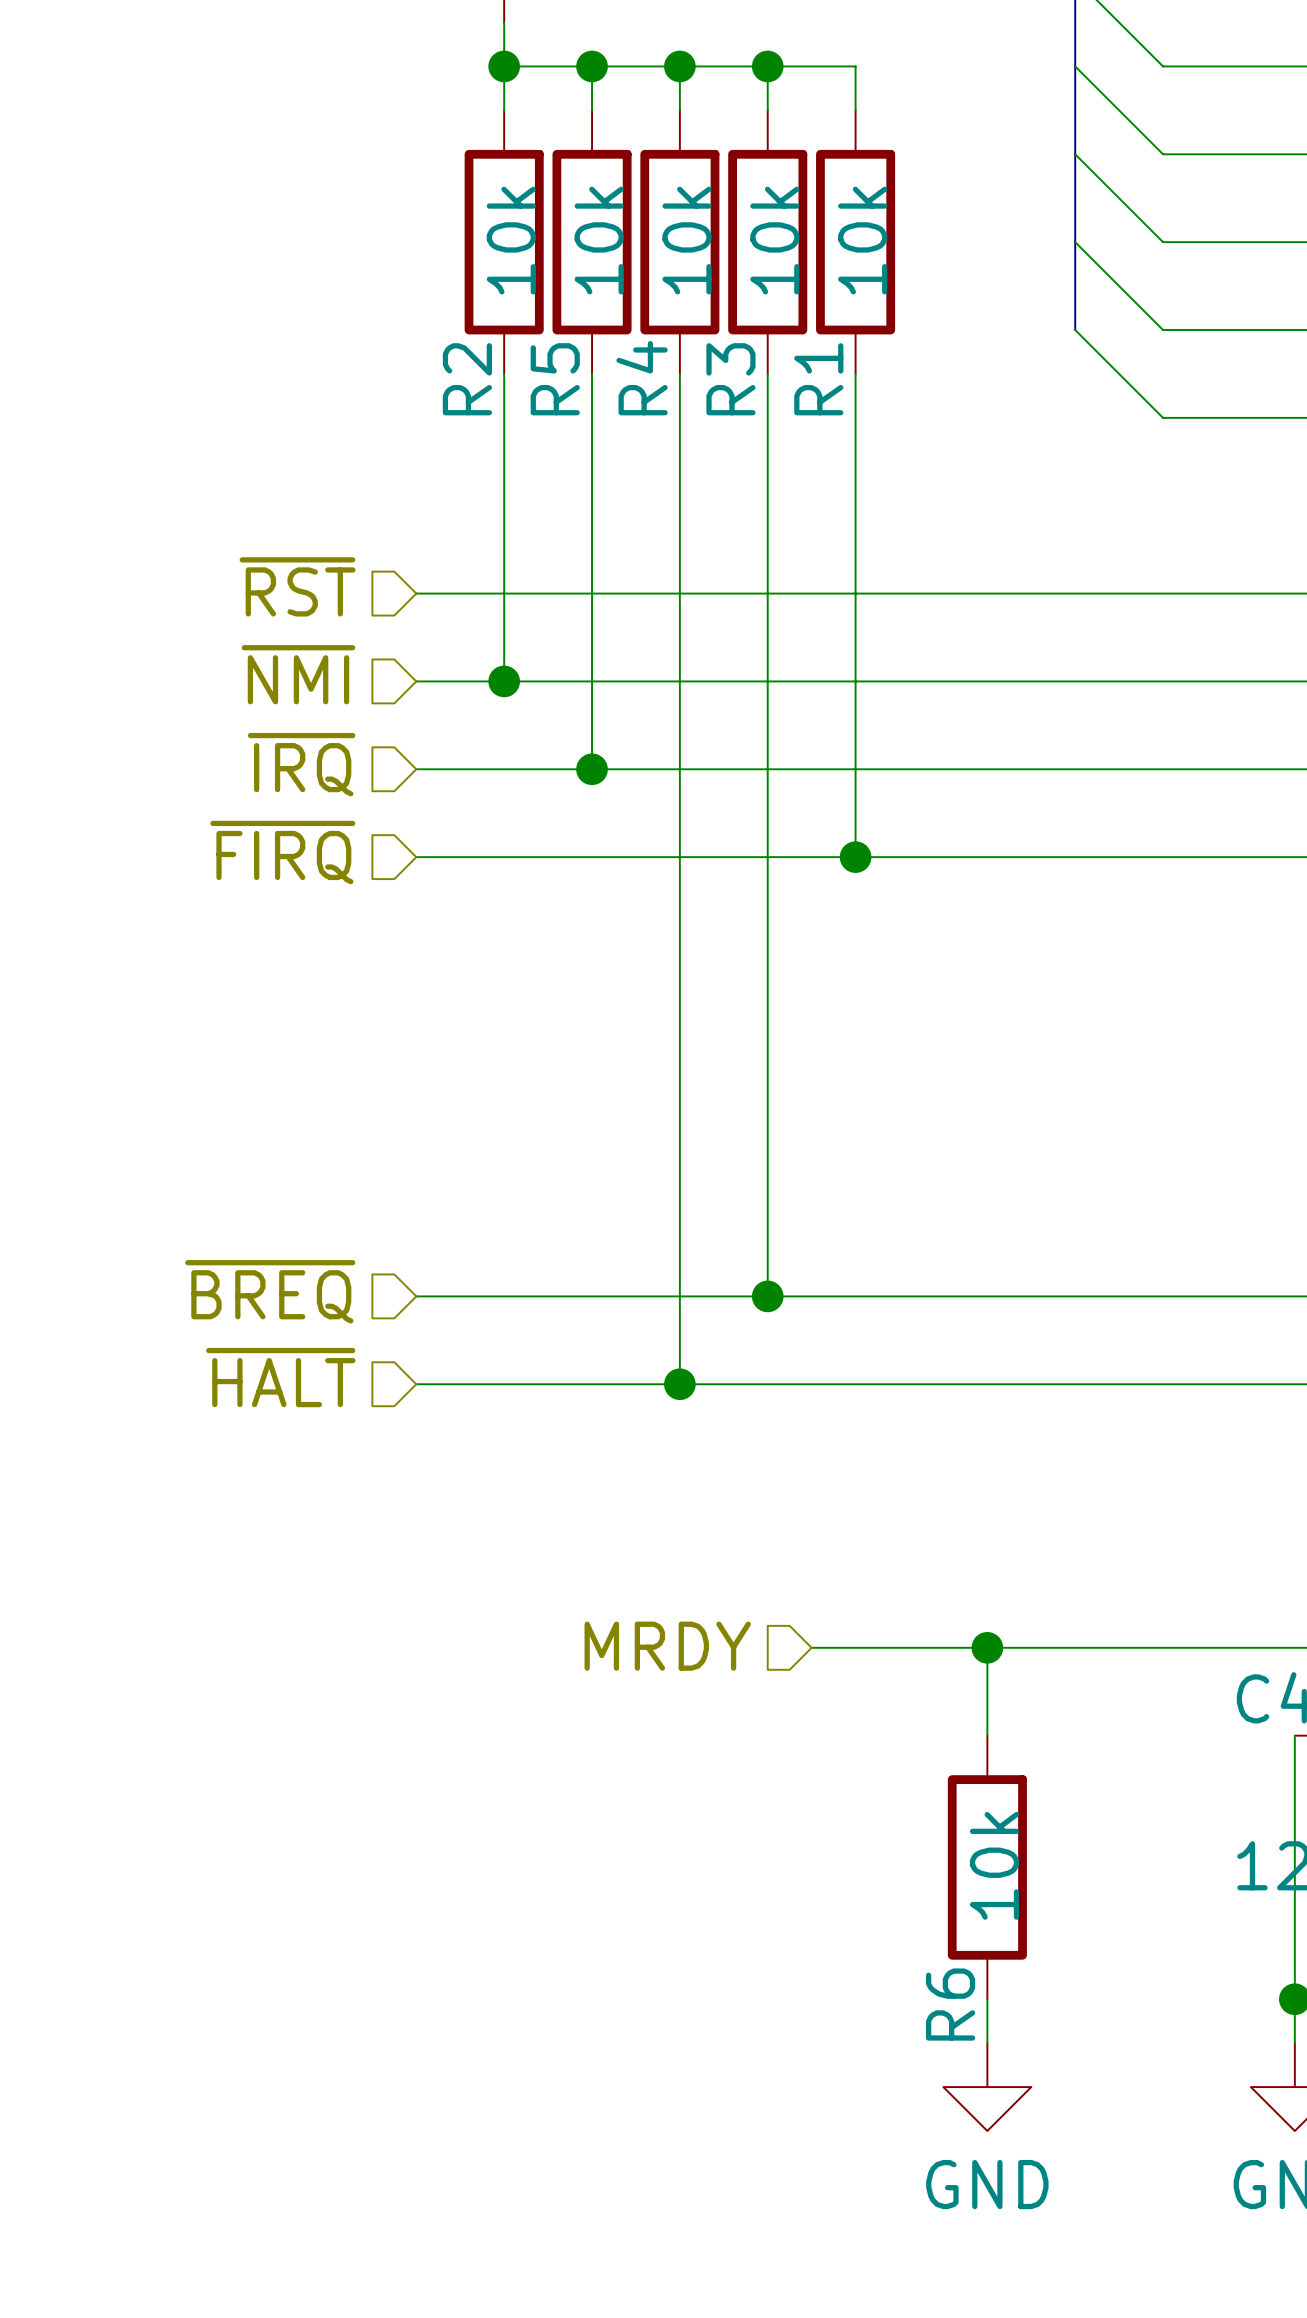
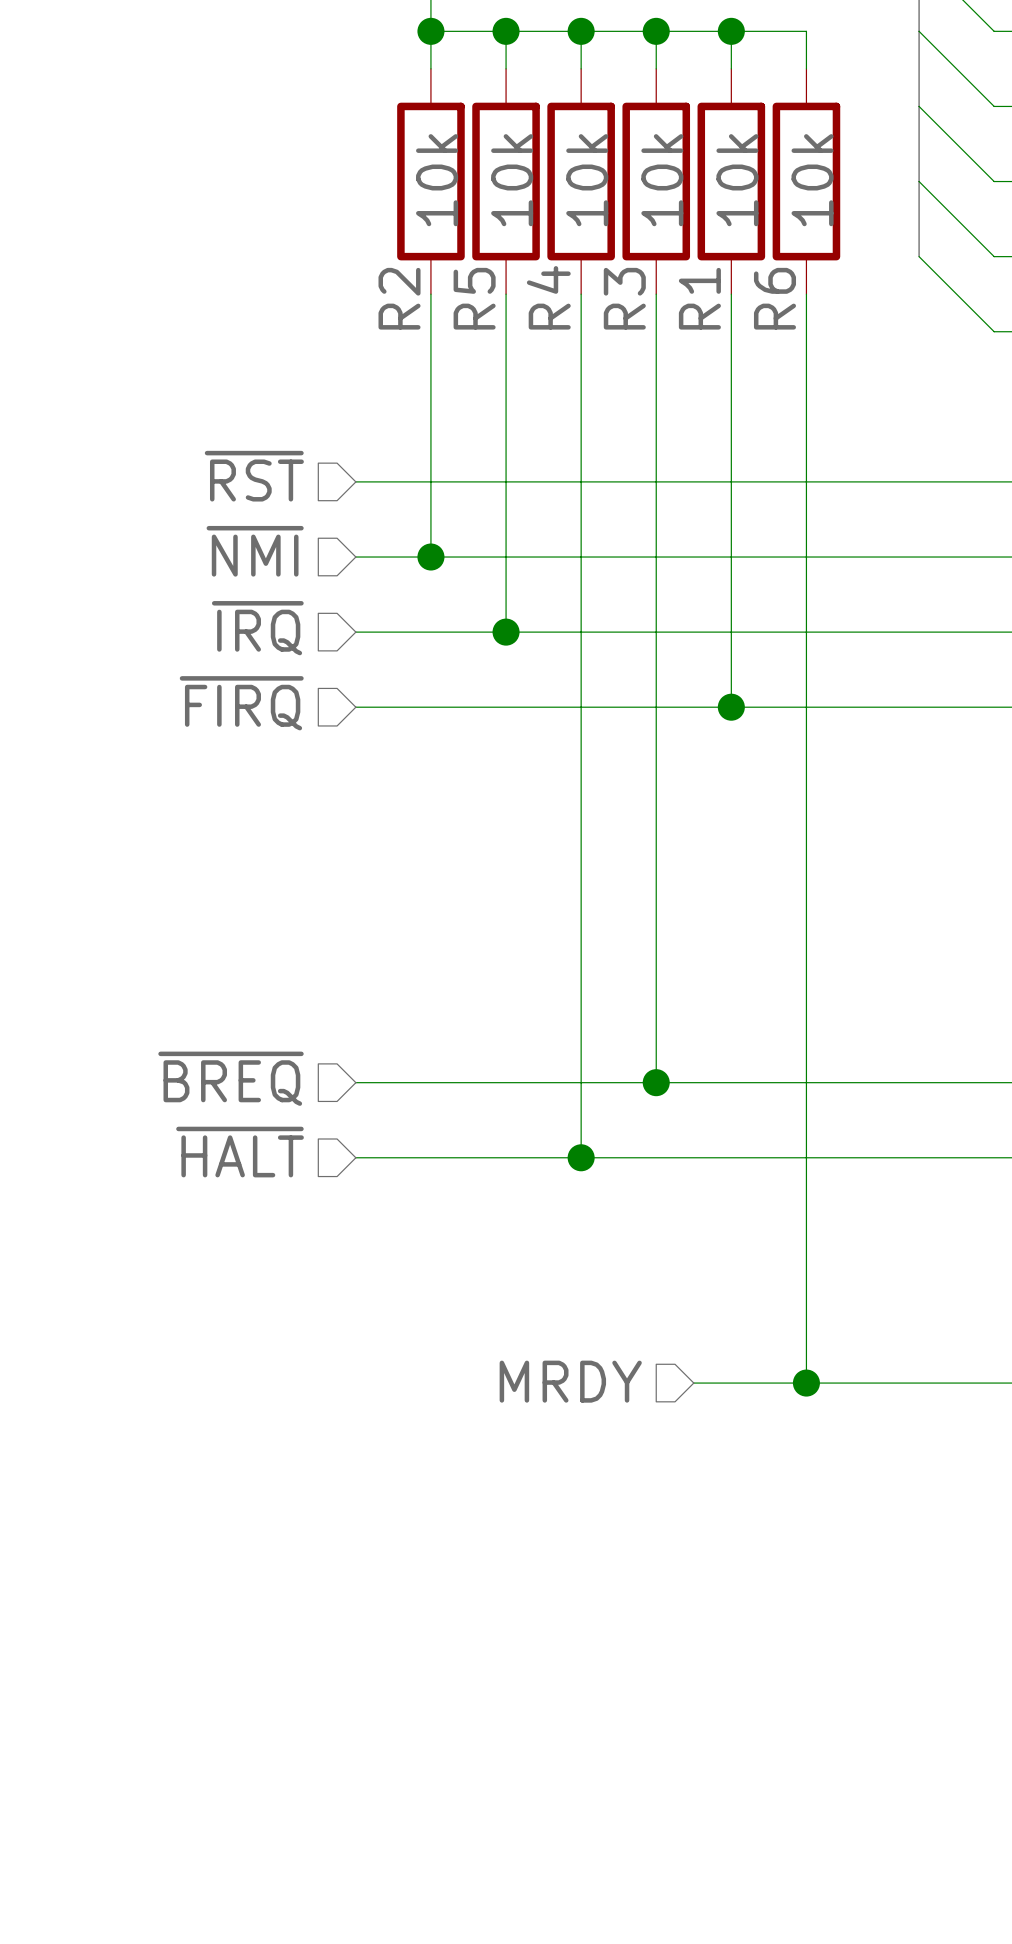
wire: none -> (731, 31) (806, 31) (806, 68)
junction: none -> (731, 31)
wire: none -> (806, 294) (806, 1383)
wire: (987, 1647) (987, 1735) -> none
junction position: (987, 1647) -> (806, 1383)
R6 position: (987, 1867) -> (806, 181)
wire: (987, 1999) (987, 2043) -> none
power symbol: GND (987, 2087) -> none

